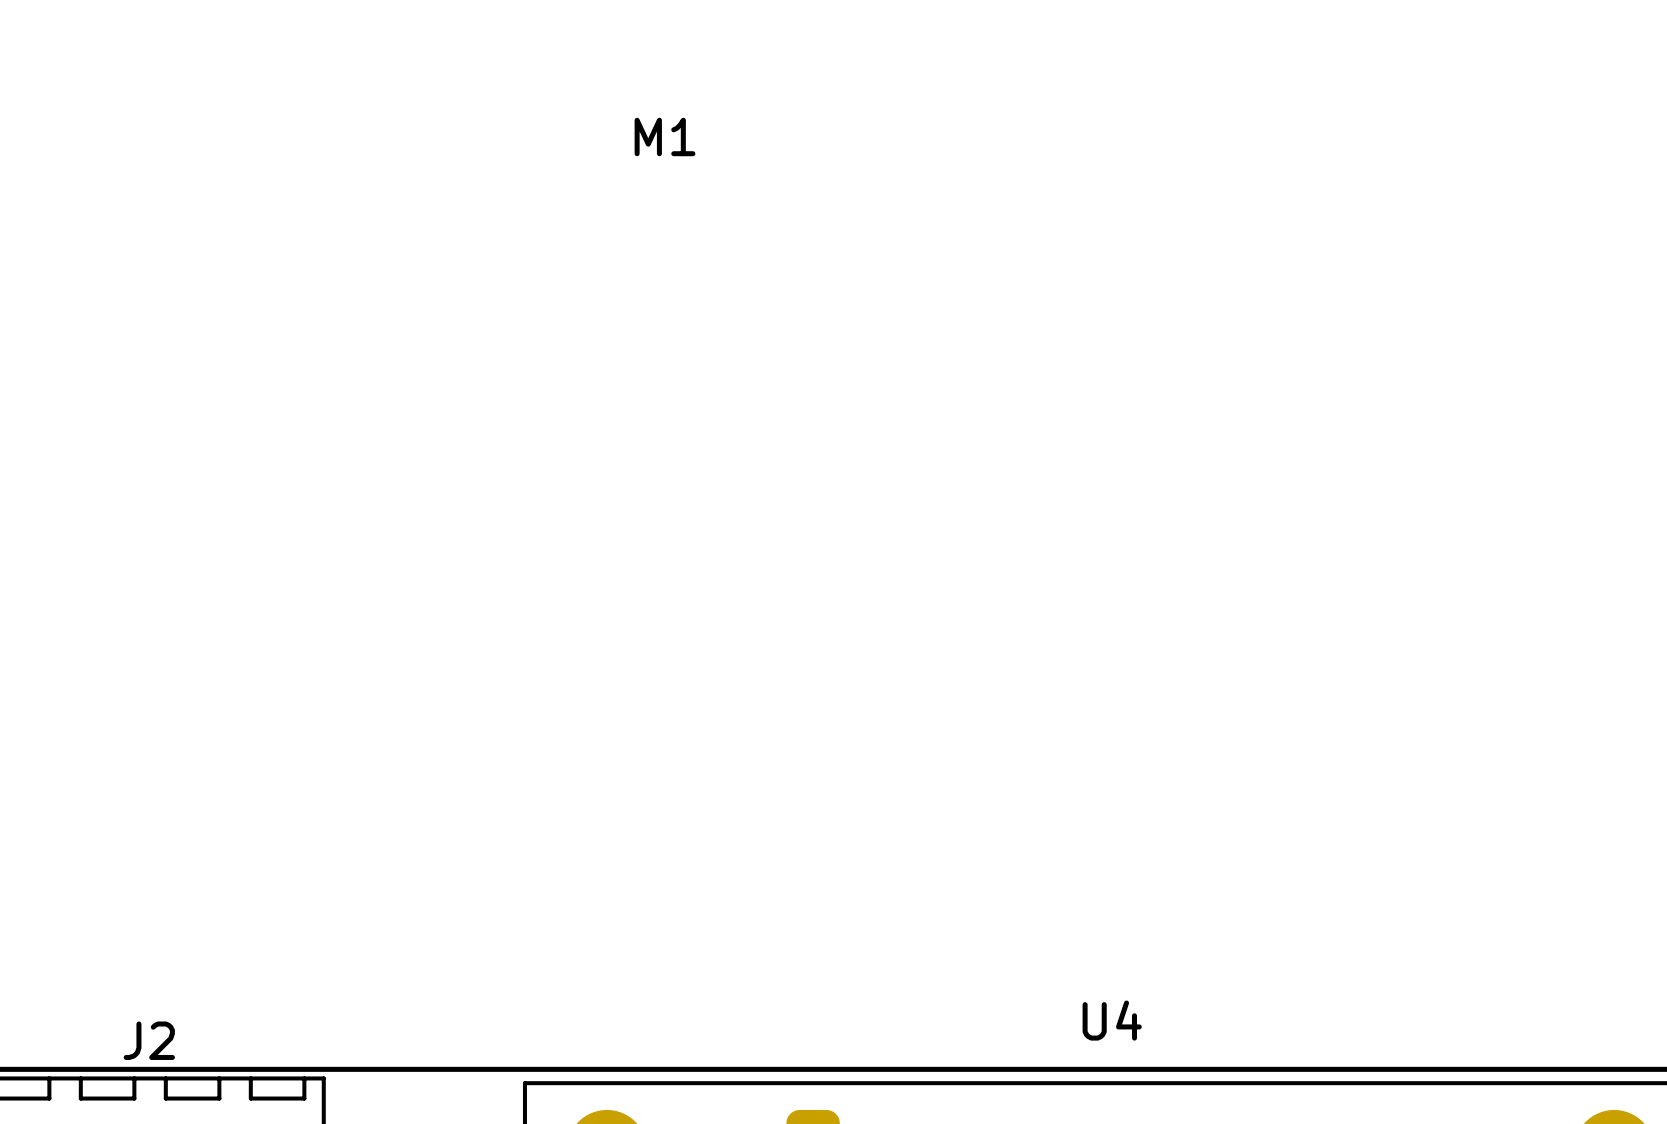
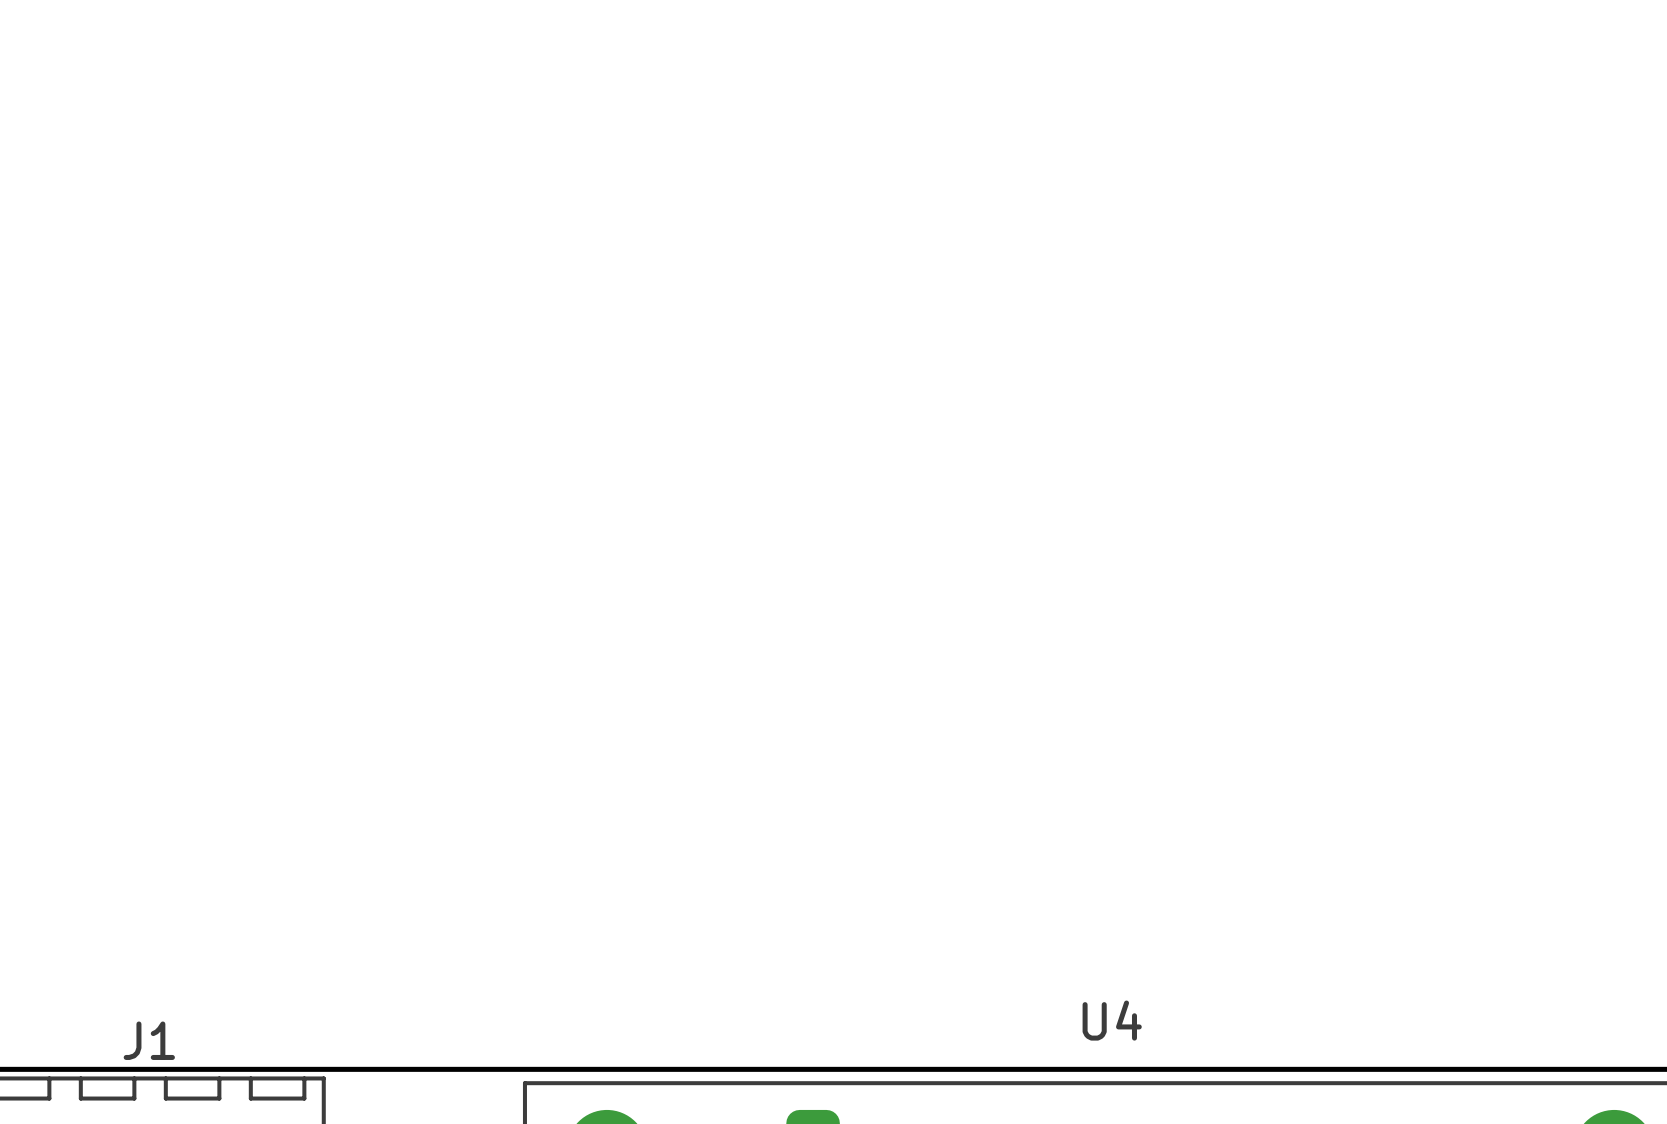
M1: (665, 136) -> none
J2 name: J2 (149, 1040) -> J1 (149, 1040)

